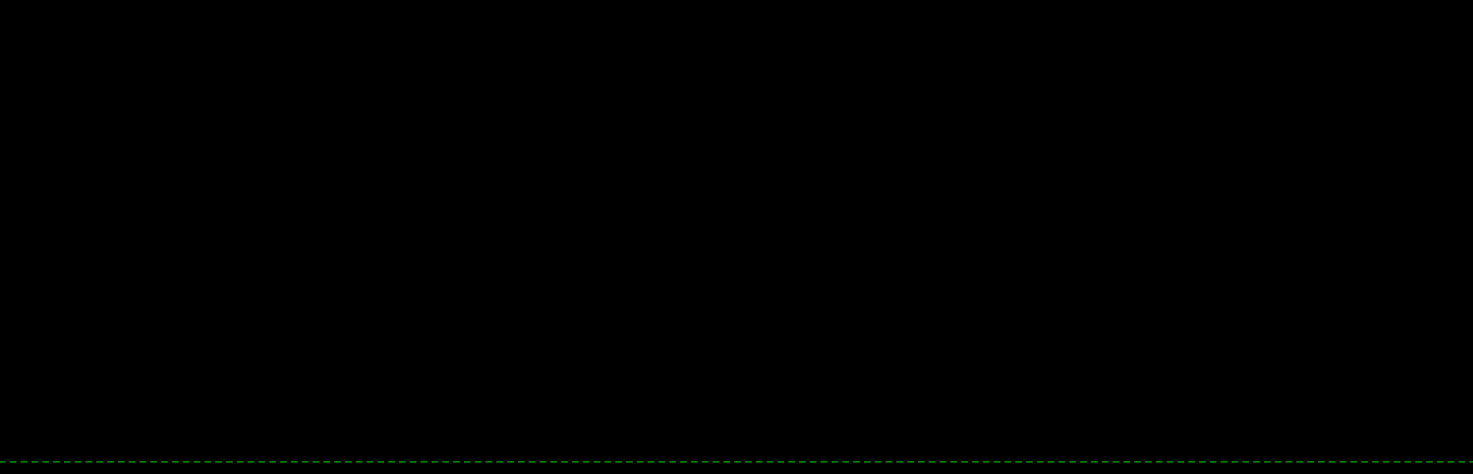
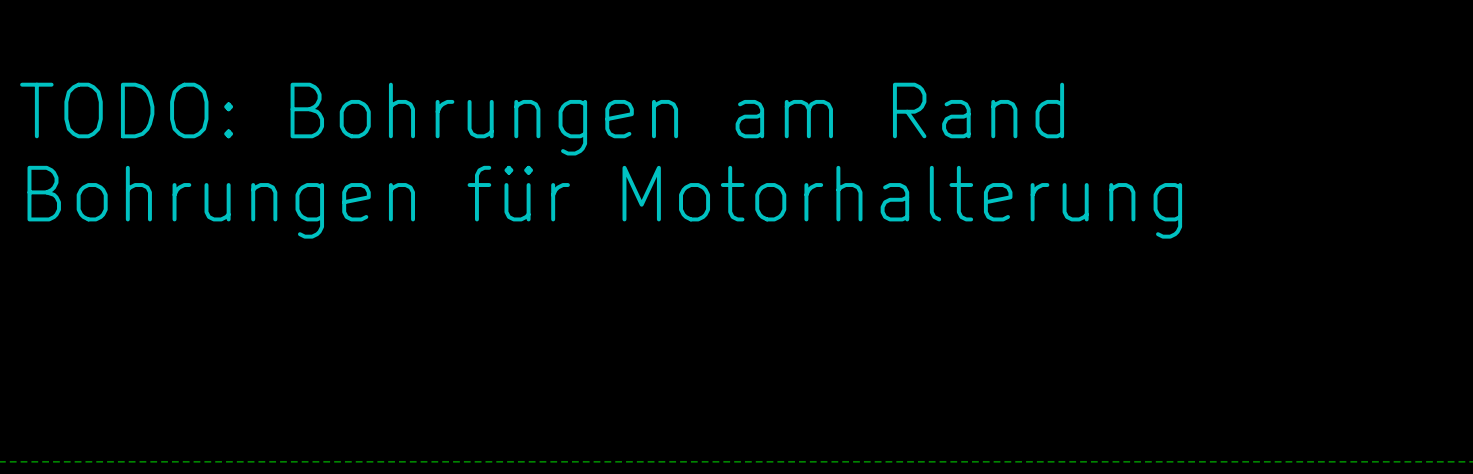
text: none -> TODO: Bohrungen am Rand (542, 119)
text: none -> Bohrungen für Motorhalterung (604, 202)

